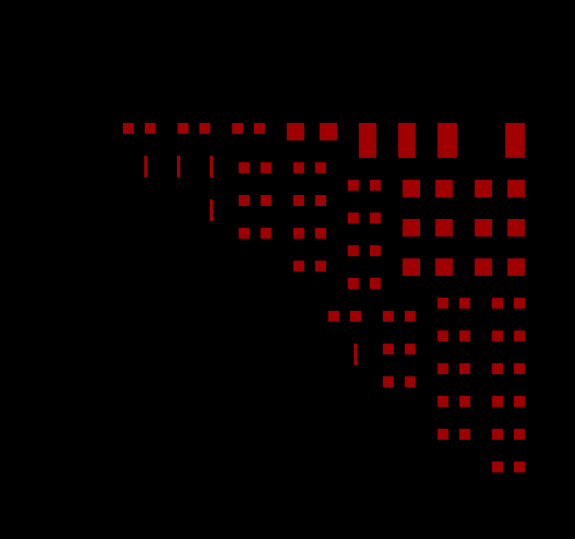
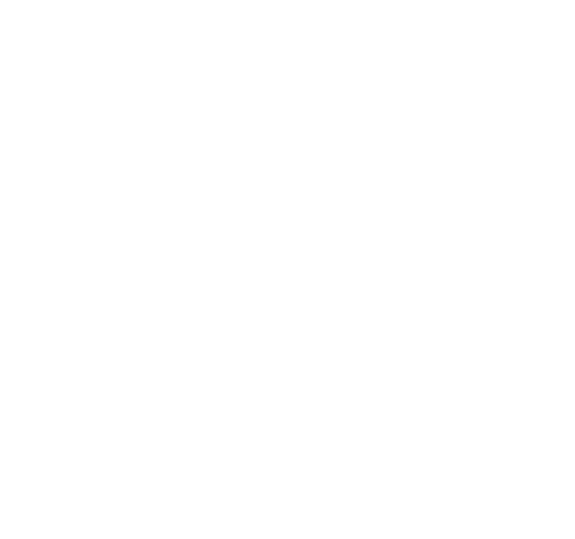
part: (139, 128) -> none
part: (193, 128) -> none
part: (248, 128) -> none
part: (311, 131) -> none
part: (387, 140) -> none
part: (481, 140) -> none
part: (145, 166) -> none
part: (178, 166) -> none
part: (211, 166) -> none
part: (255, 167) -> none
part: (309, 167) -> none
part: (364, 185) -> none
part: (427, 188) -> none
part: (499, 188) -> none
part: (255, 200) -> none
part: (309, 200) -> none
part: (211, 210) -> none
part: (364, 217) -> none
part: (427, 227) -> none
part: (499, 227) -> none
part: (255, 233) -> none
part: (309, 233) -> none
part: (364, 250) -> none
part: (309, 266) -> none
part: (427, 267) -> none
part: (499, 267) -> none
part: (364, 283) -> none
part: (453, 303) -> none
part: (508, 303) -> none
part: (344, 316) -> none
part: (399, 316) -> none
part: (453, 335) -> none
part: (508, 335) -> none
part: (399, 349) -> none
part: (355, 354) -> none
part: (453, 368) -> none
part: (508, 368) -> none
part: (399, 381) -> none
part: (453, 401) -> none
part: (508, 401) -> none
part: (453, 434) -> none
part: (508, 434) -> none
part: (508, 466) -> none

